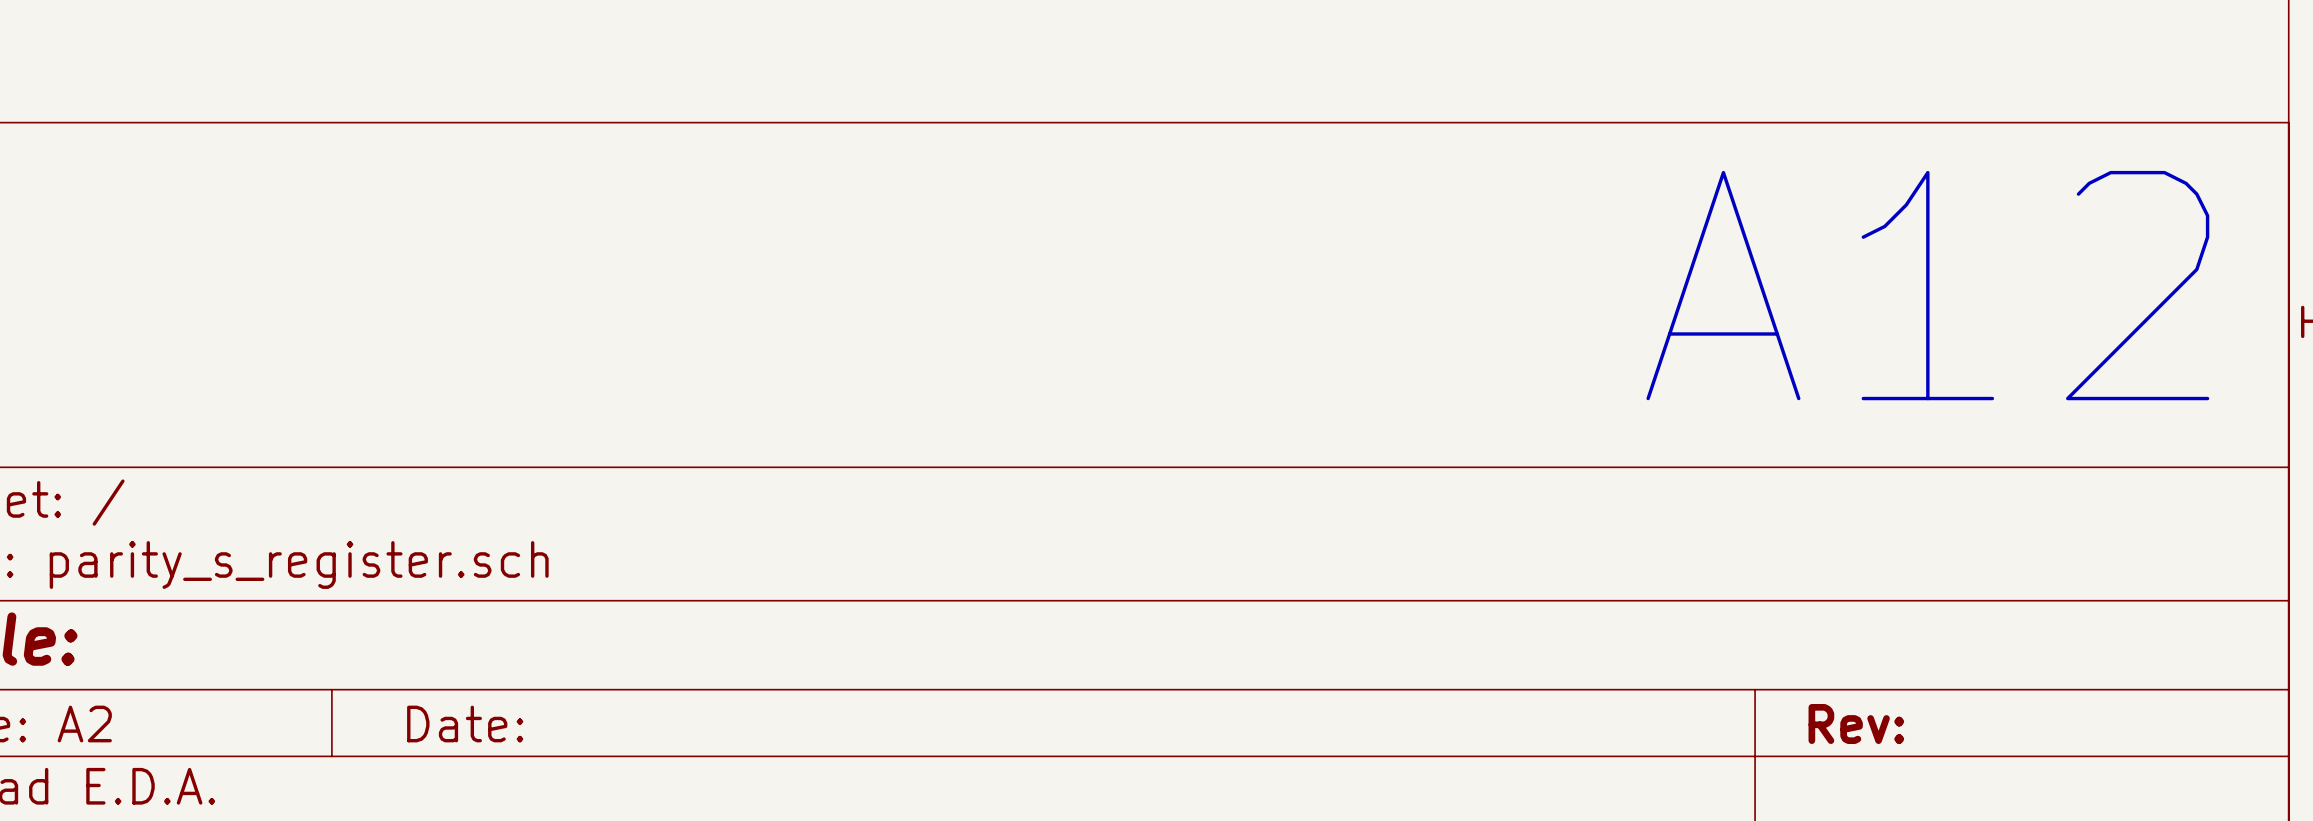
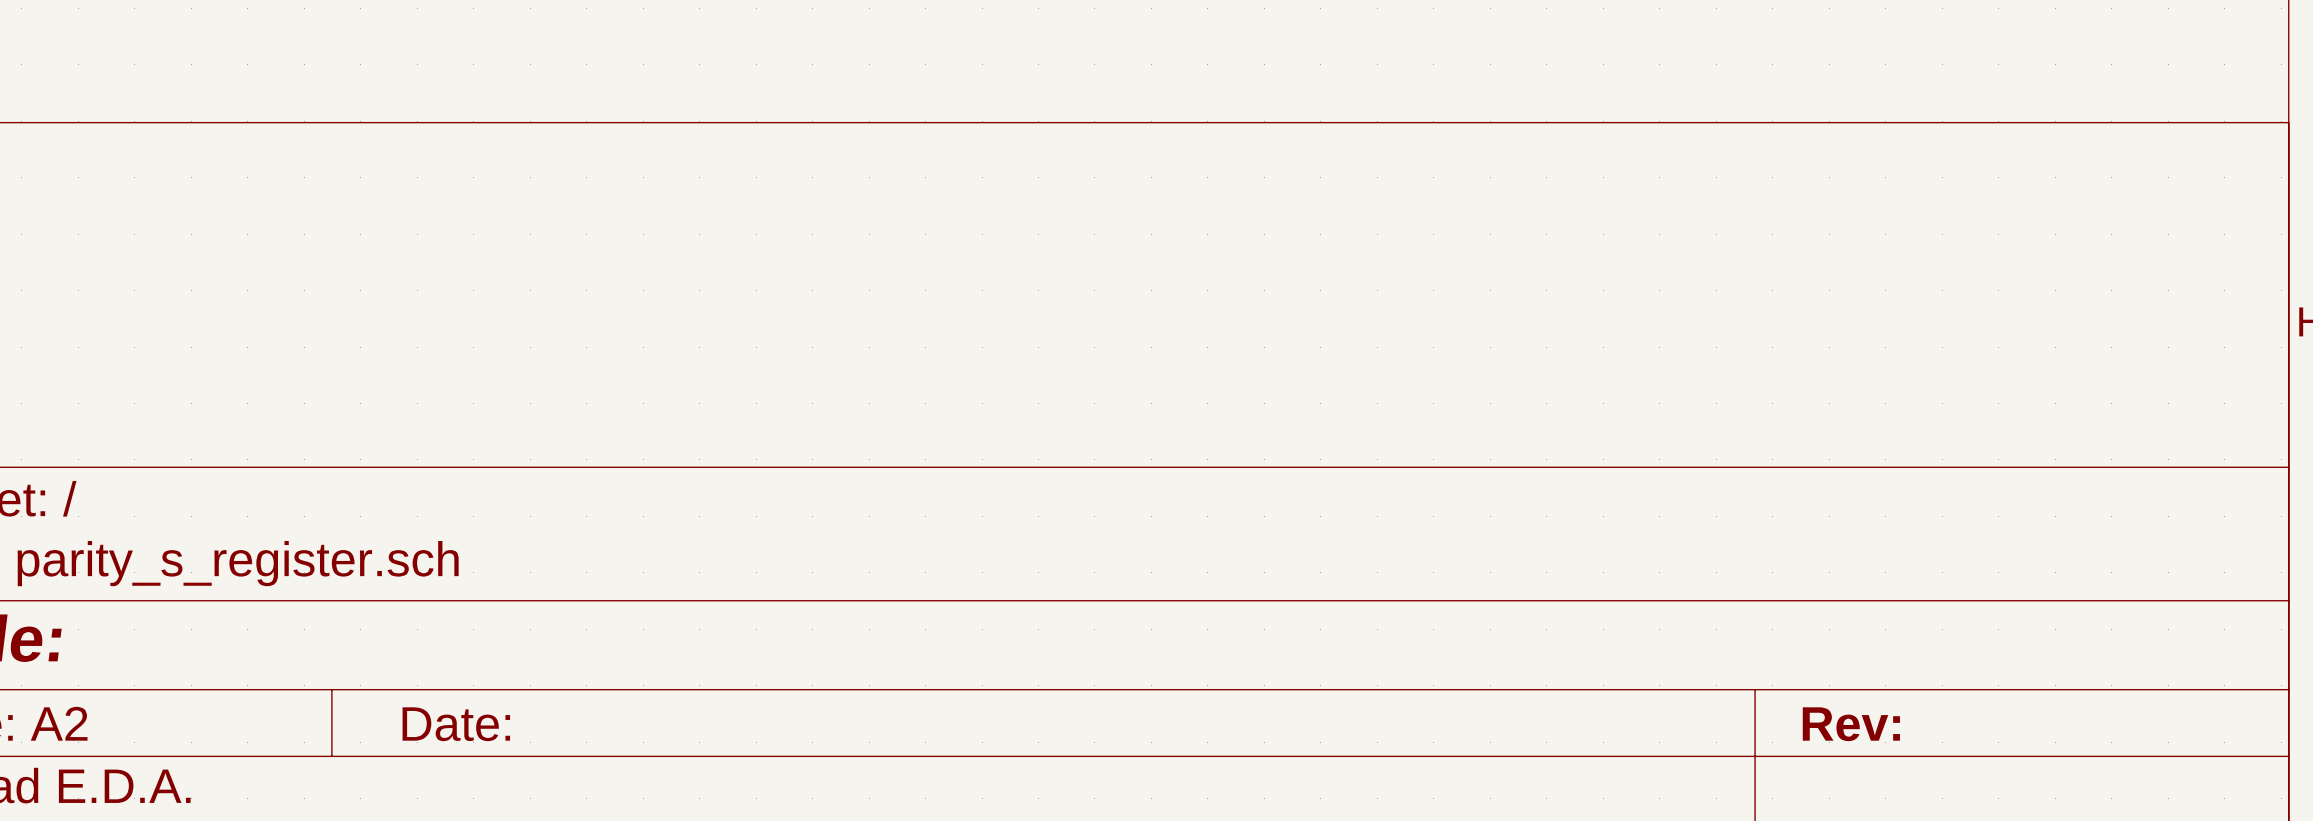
text: A12 (1927, 285) -> none

